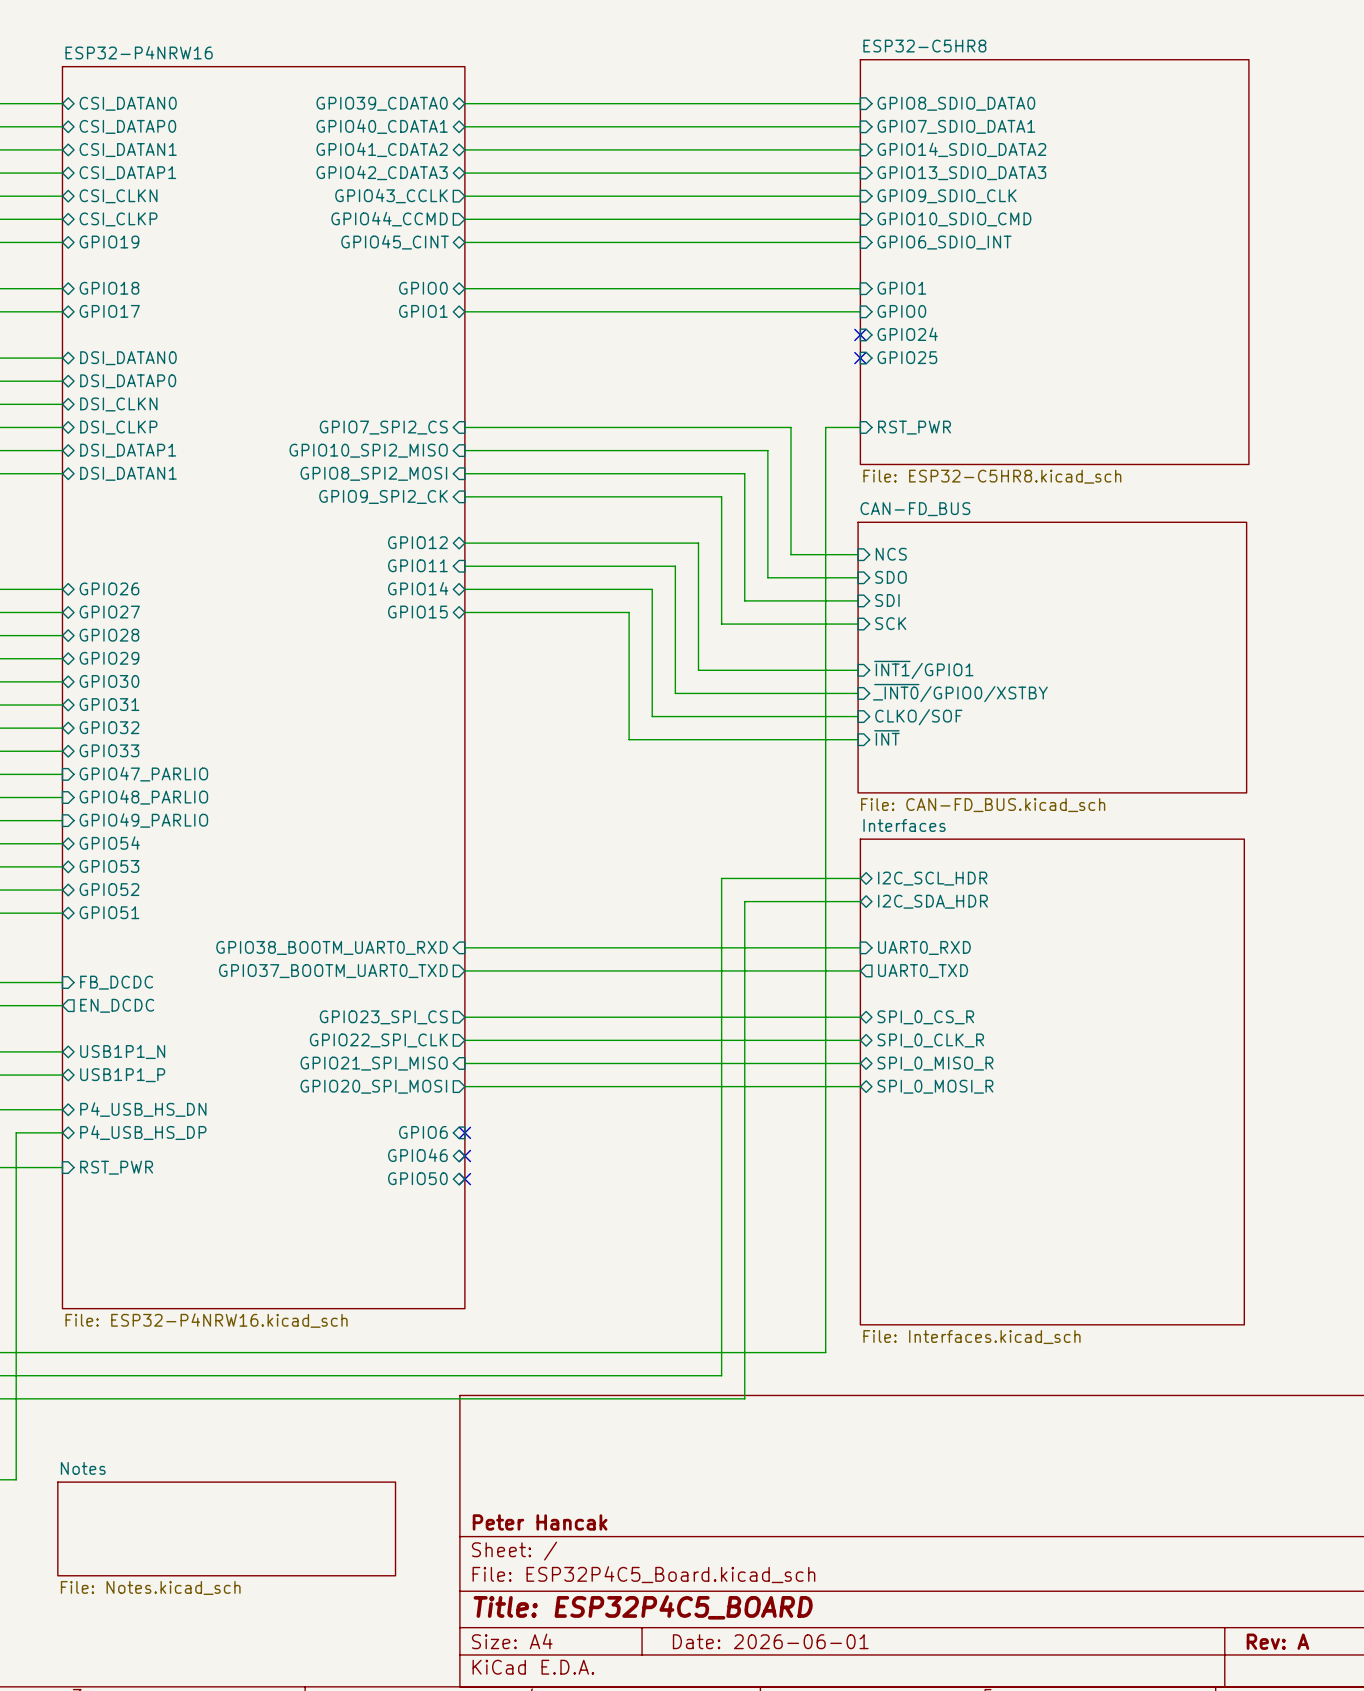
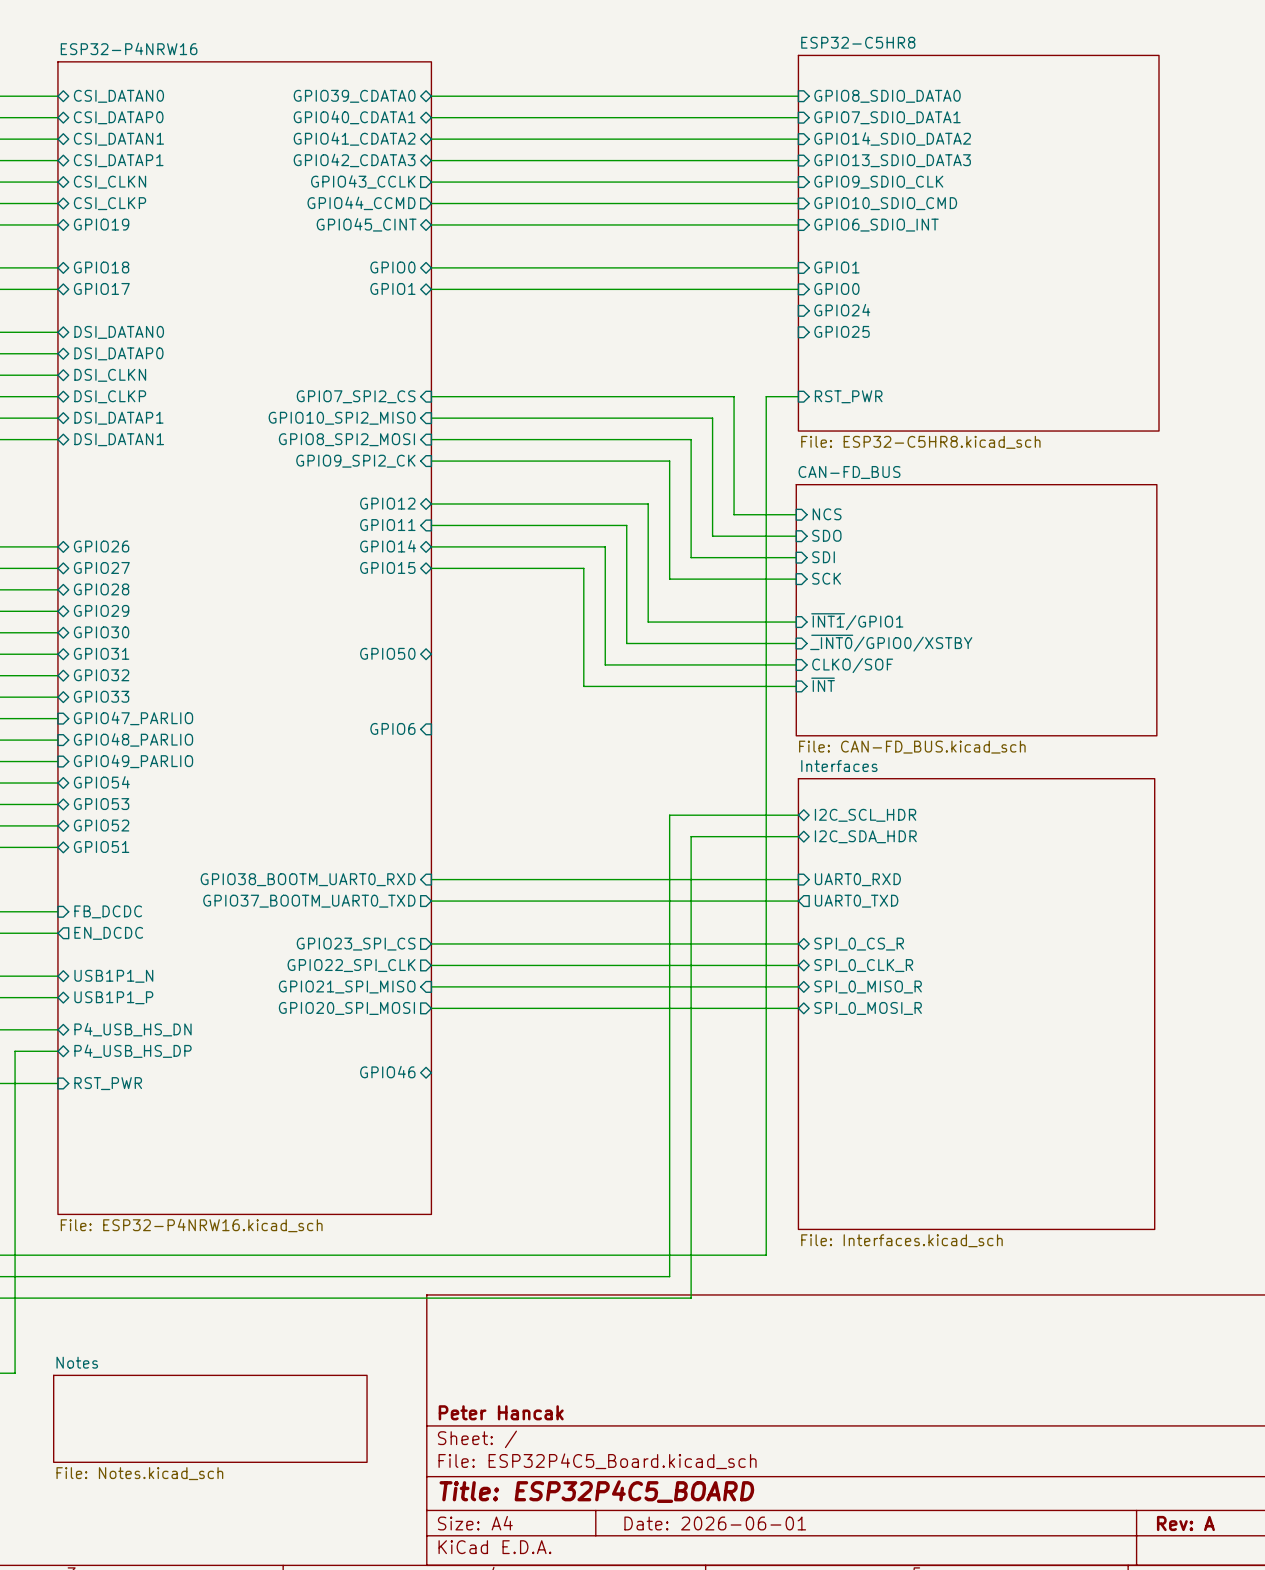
no-connect mark: (860, 334) -> none
no-connect mark: (860, 358) -> none
sheet pin: none -> GPIO50 (387, 653)
sheet pin: none -> GPIO6 (392, 728)
sheet pin: GPIO6 (423, 1132) -> none
no-connect mark: (464, 1132) -> none
no-connect mark: (464, 1155) -> none
sheet pin: GPIO50 (417, 1178) -> none
no-connect mark: (464, 1179) -> none

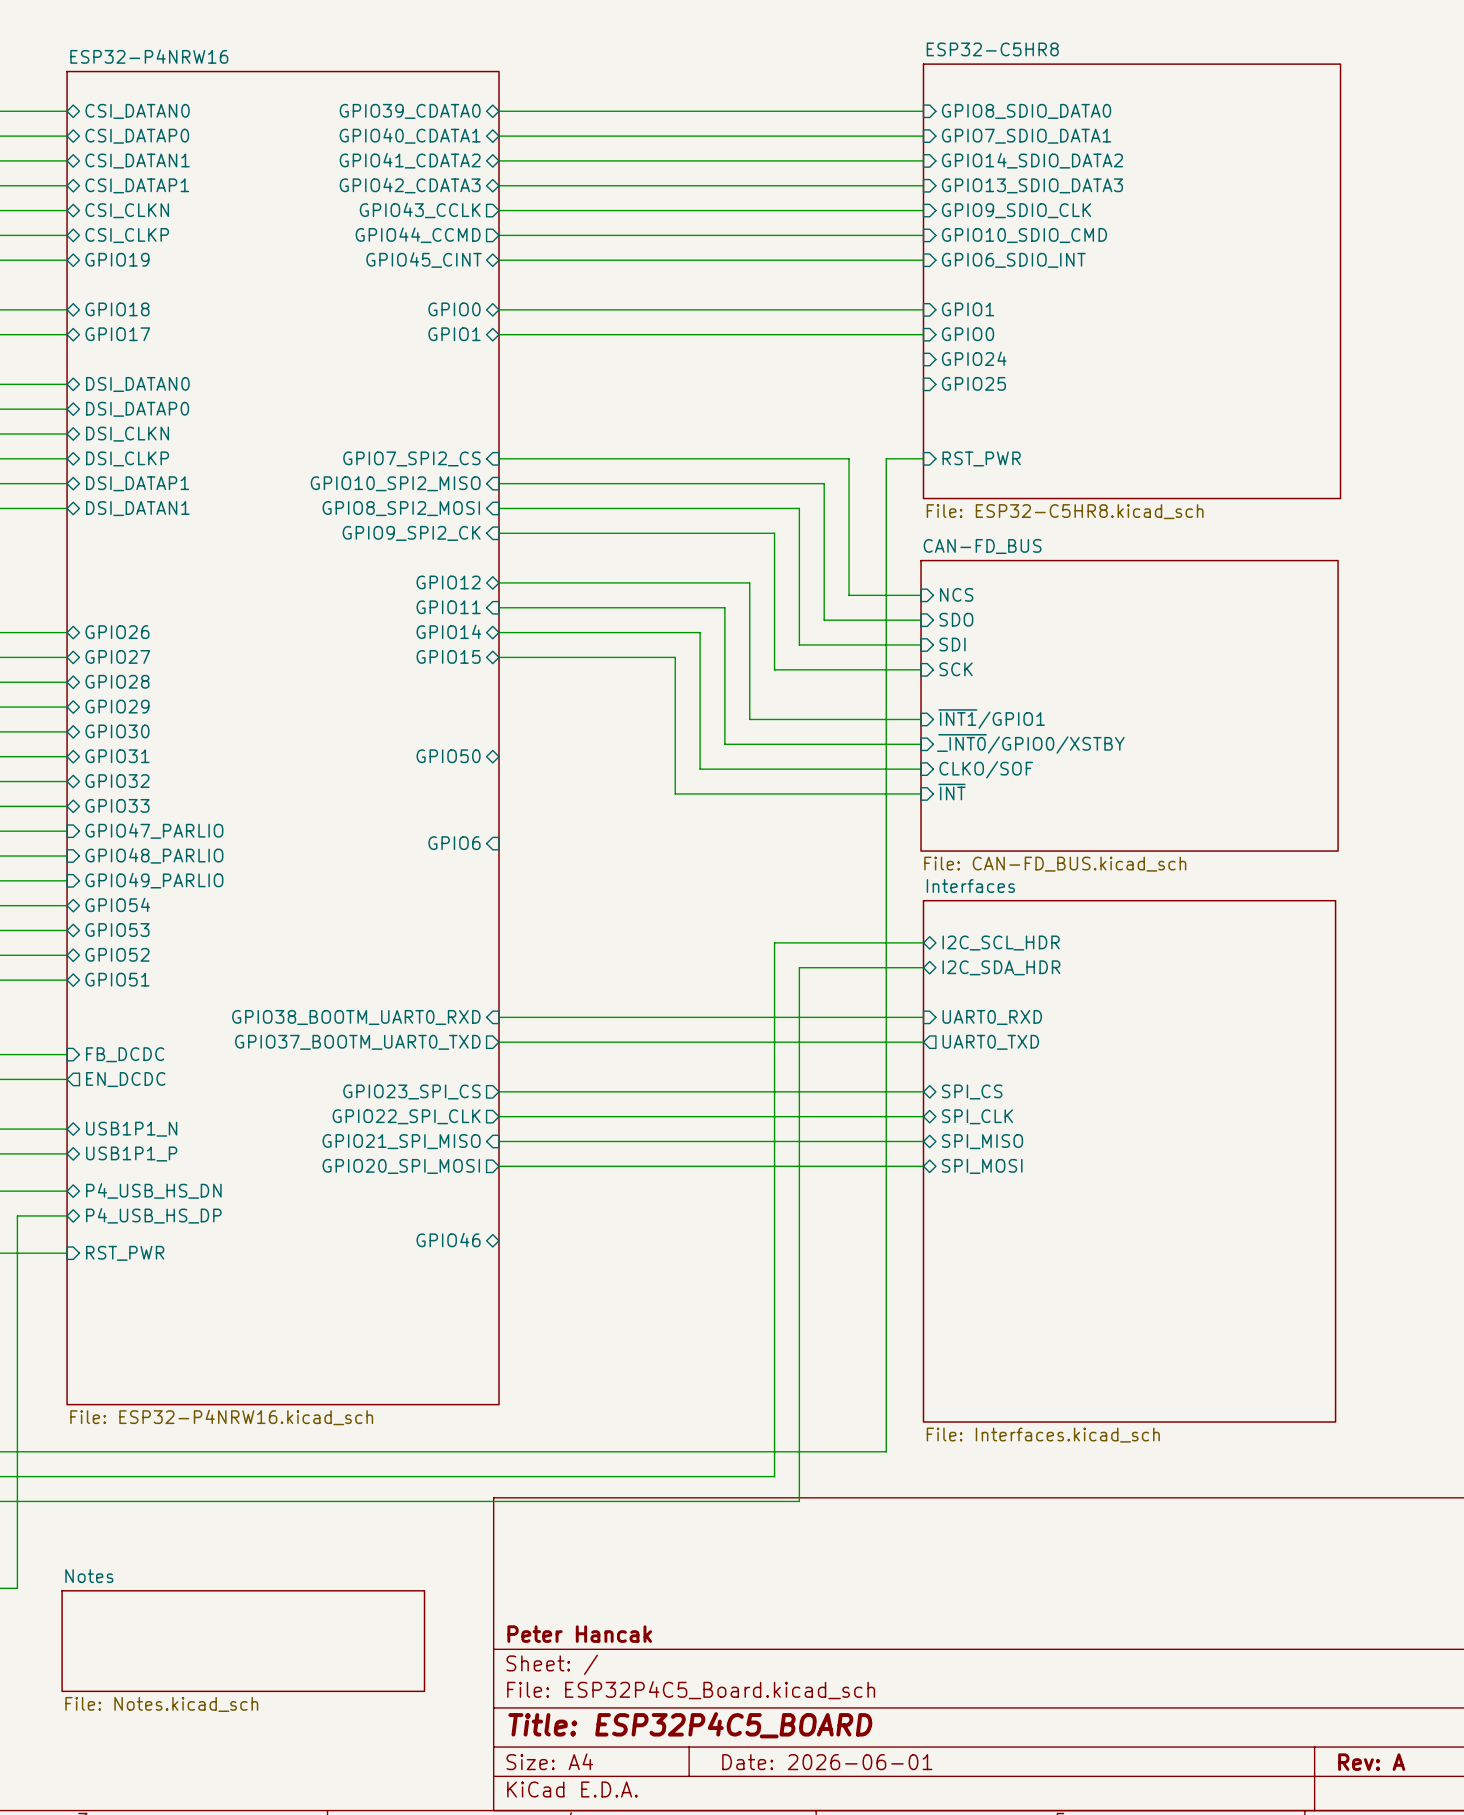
sheet pin: SPI_0_CS_R (859, 944) -> SPI_CS (972, 1091)
sheet pin: SPI_0_CLK_R (863, 965) -> SPI_CLK (977, 1116)
sheet pin: SPI_0_MISO_R (868, 987) -> SPI_MISO (982, 1141)
sheet pin: SPI_0_MOSI_R (868, 1008) -> SPI_MOSI (982, 1166)

